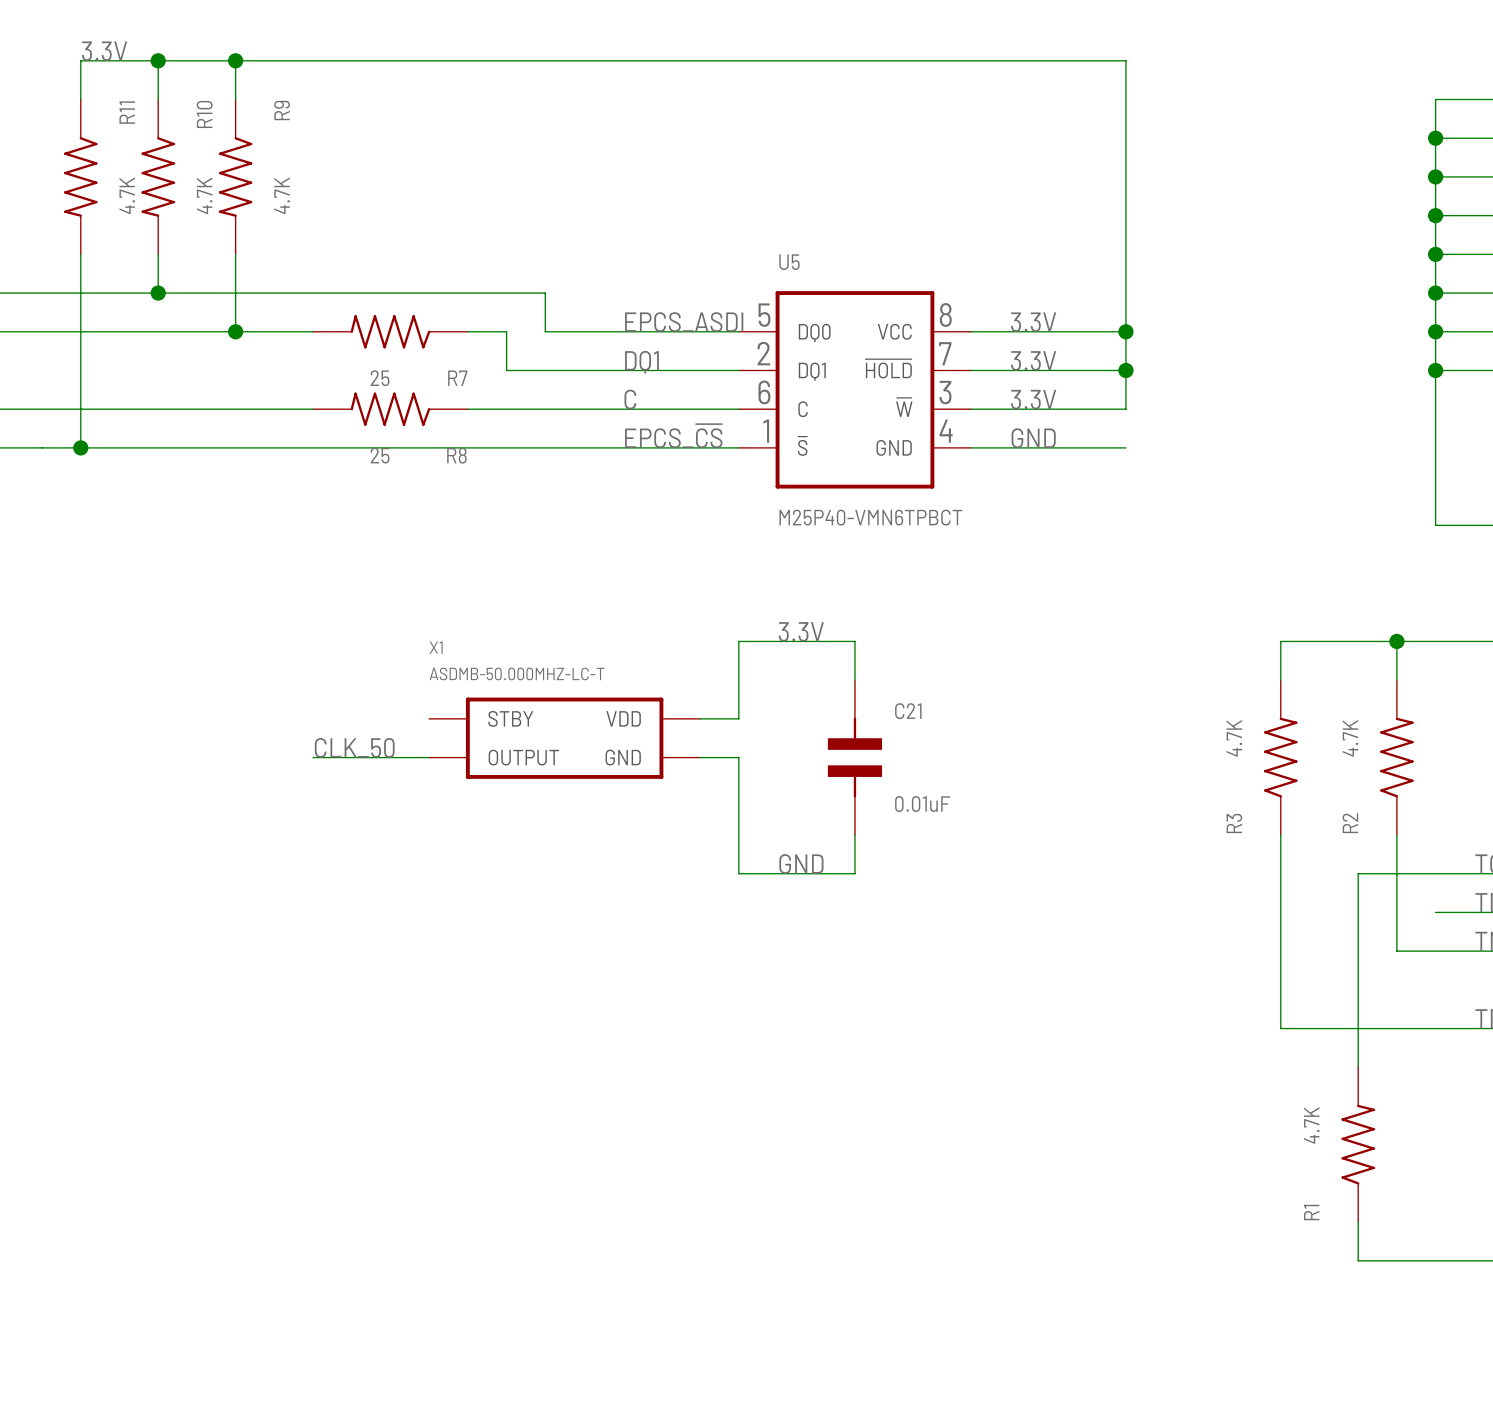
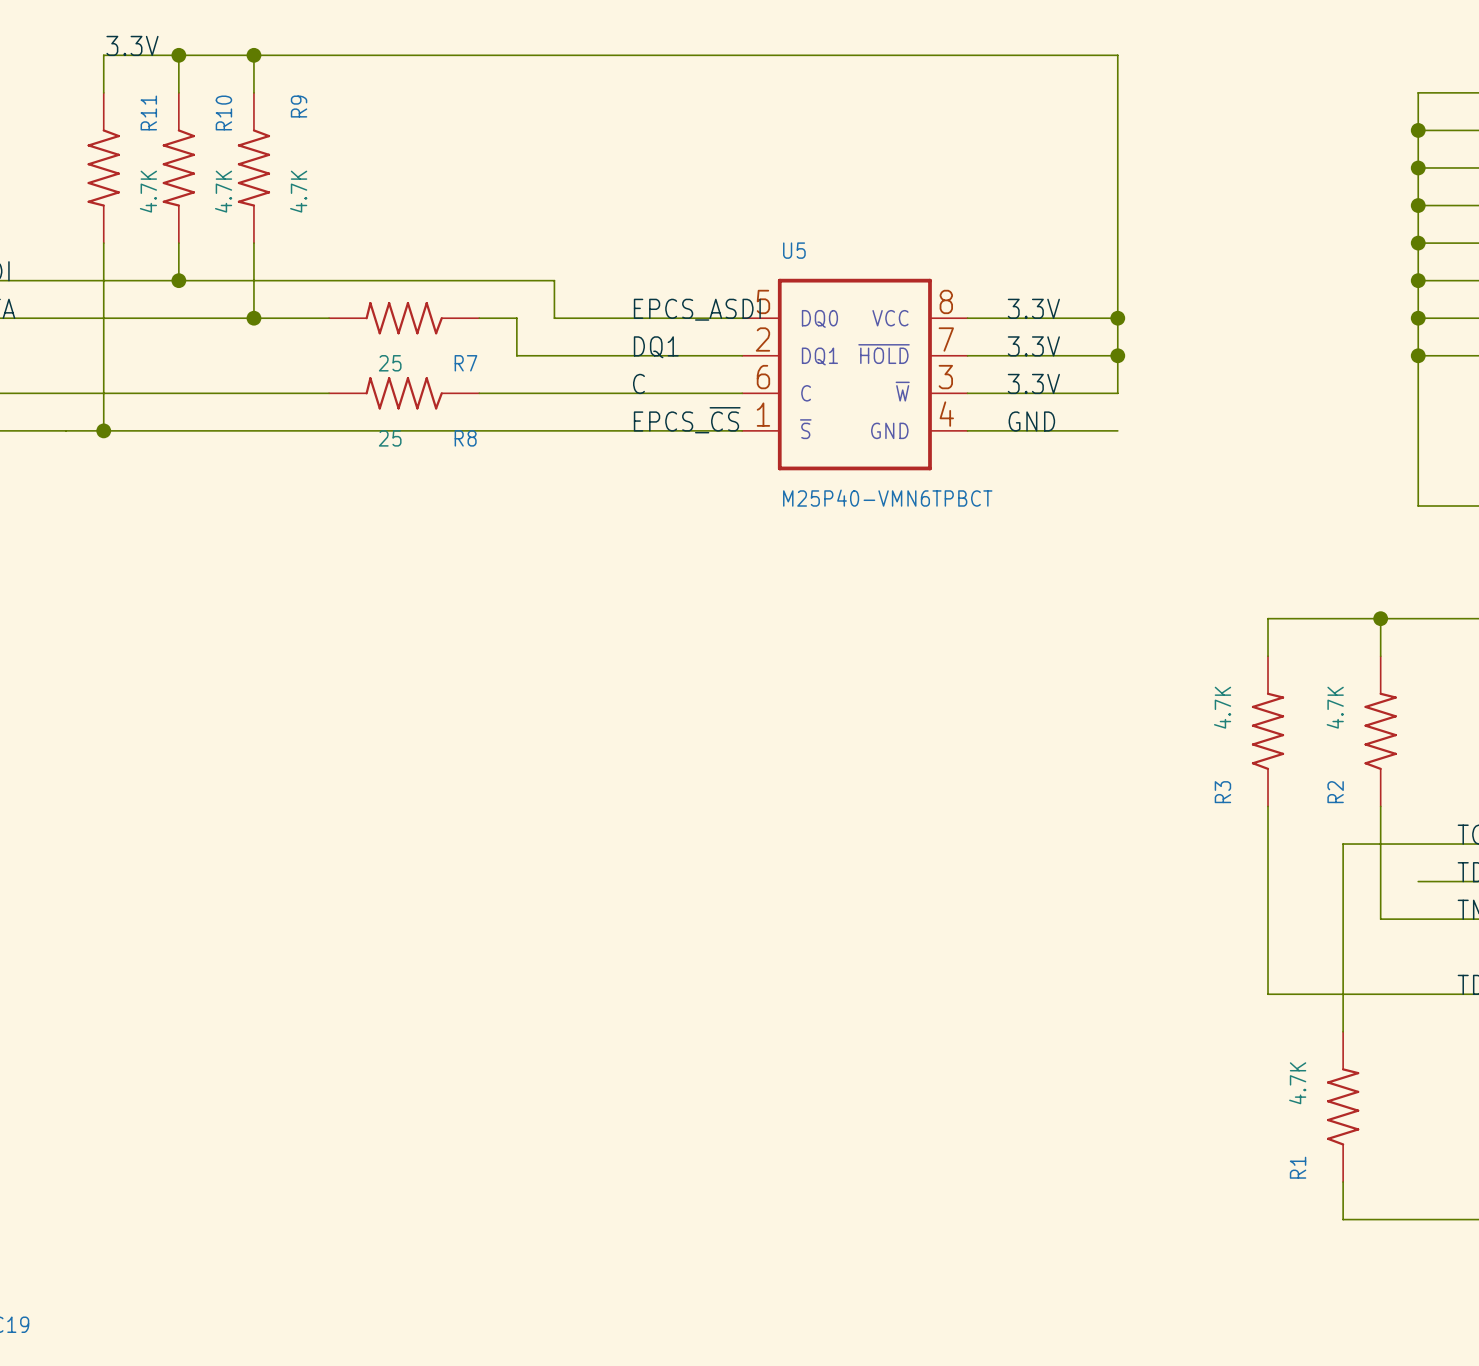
label: 3.3V (801, 631) -> none
wire: (854, 680) (854, 641) (738, 641) (738, 718) (700, 718) -> none
X1: ASDMB-50.000MHZ-LC-T (564, 738) -> none
label: CLK_50 (354, 747) -> none
wire: (313, 757) (429, 757) -> none
wire: (700, 757) (738, 757) (738, 873) (854, 873) (854, 835) -> none
C21: 0.01uF (854, 757) -> none
label: GND (801, 864) -> none

